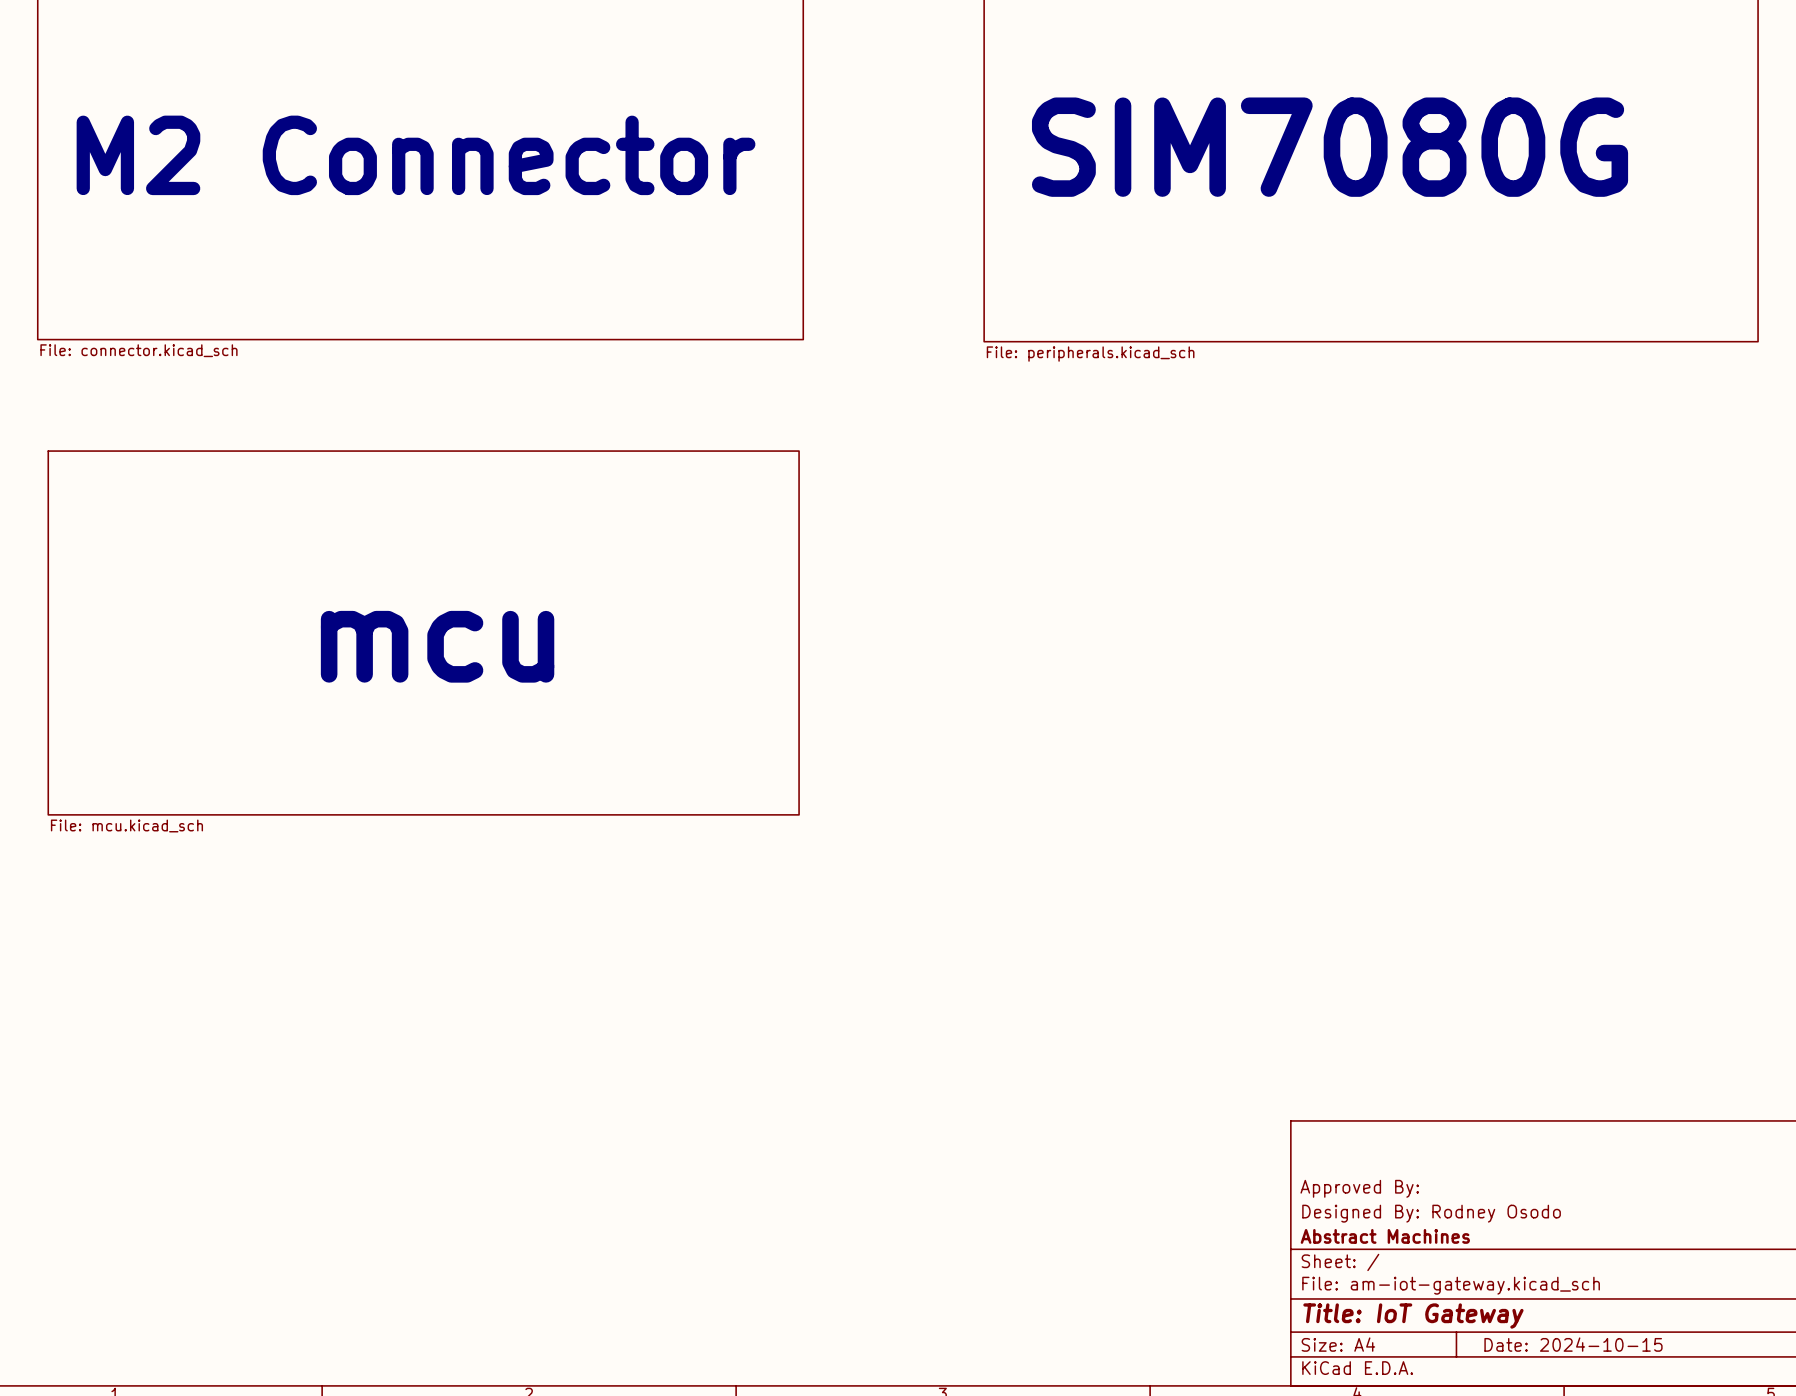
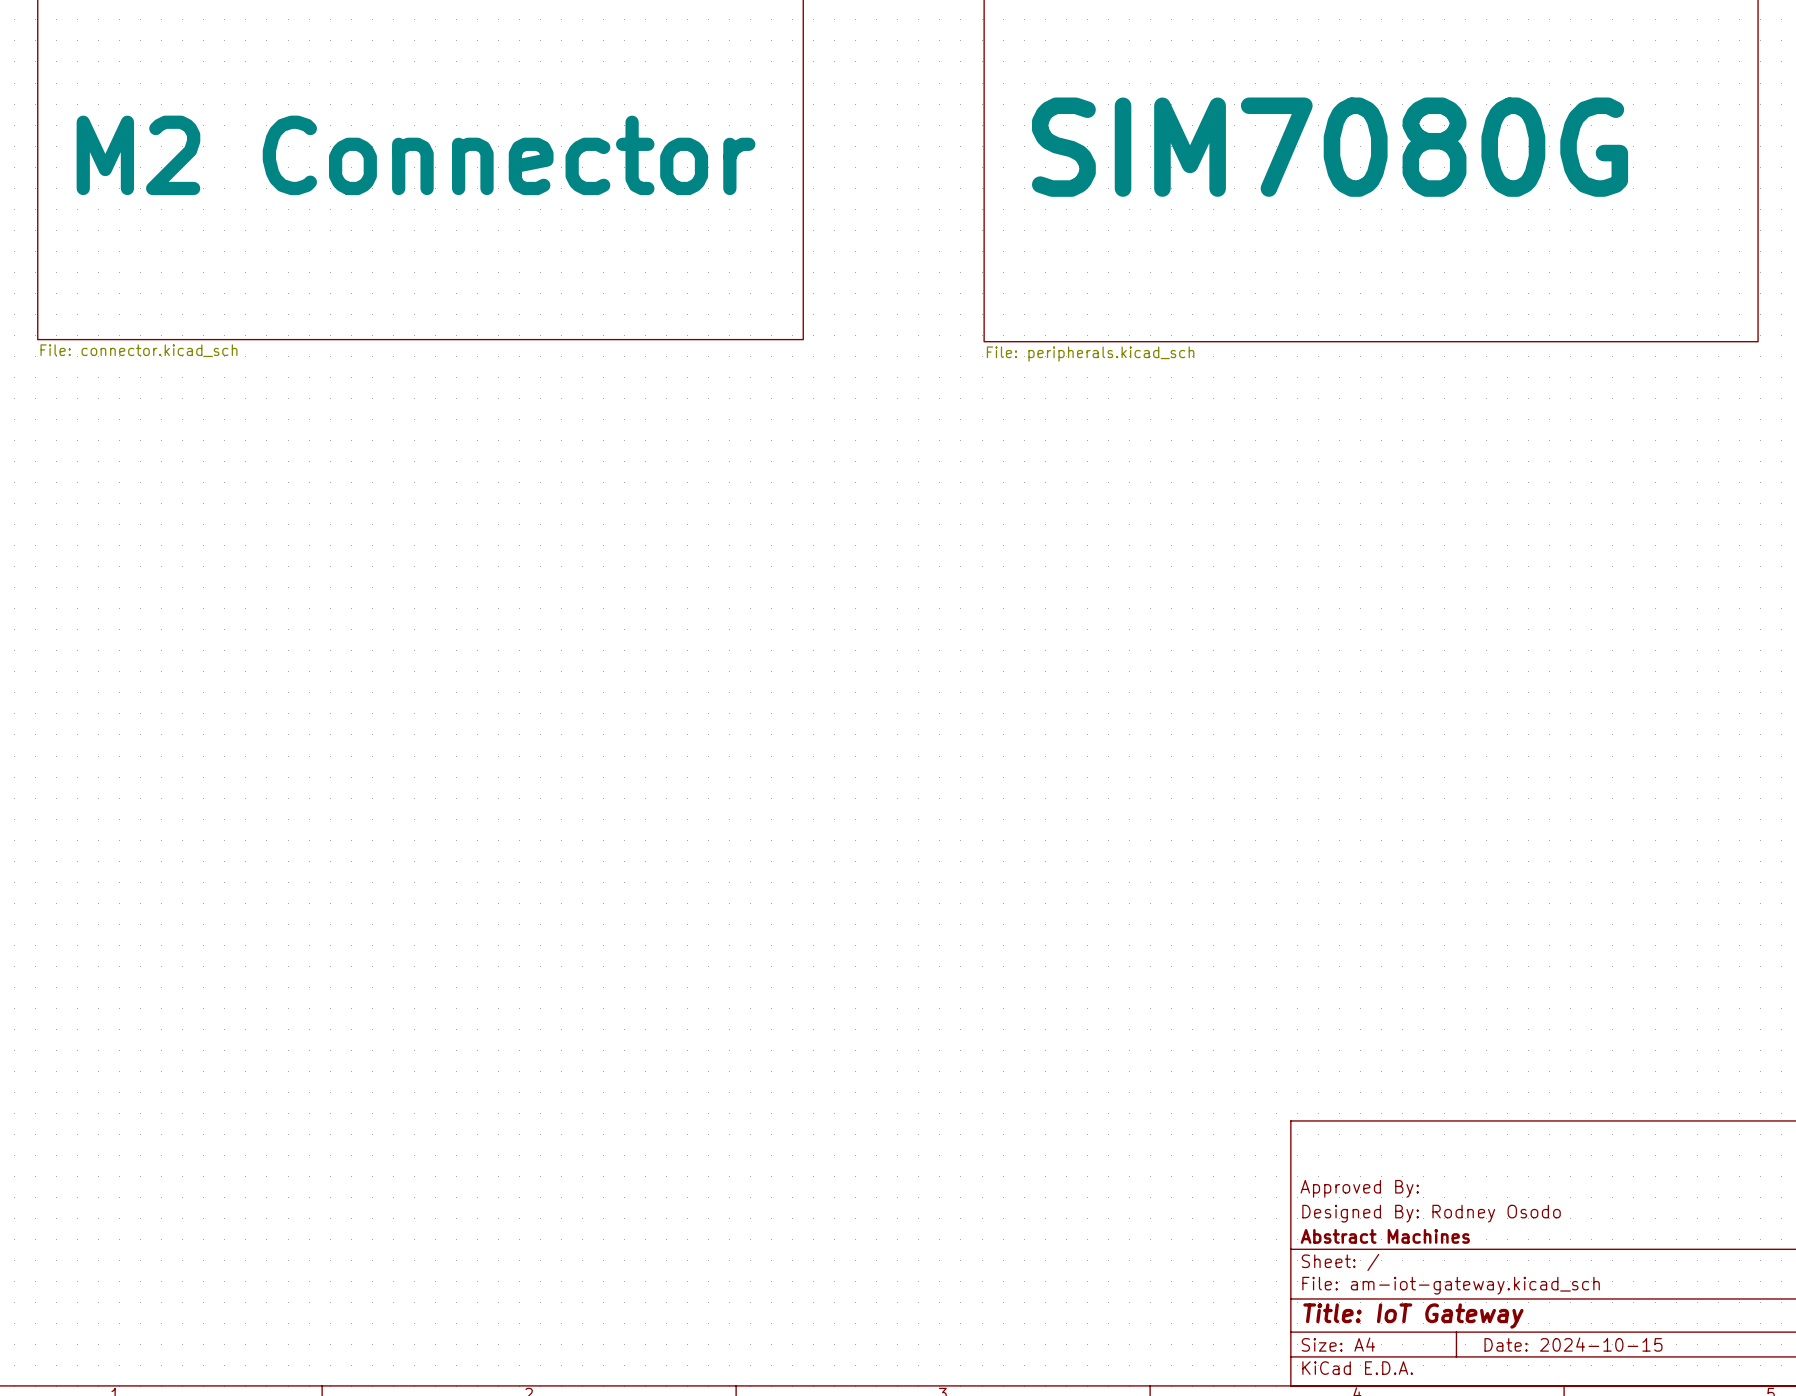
sheet mcu: File: mcu.kicad_sch (423, 632) -> none

